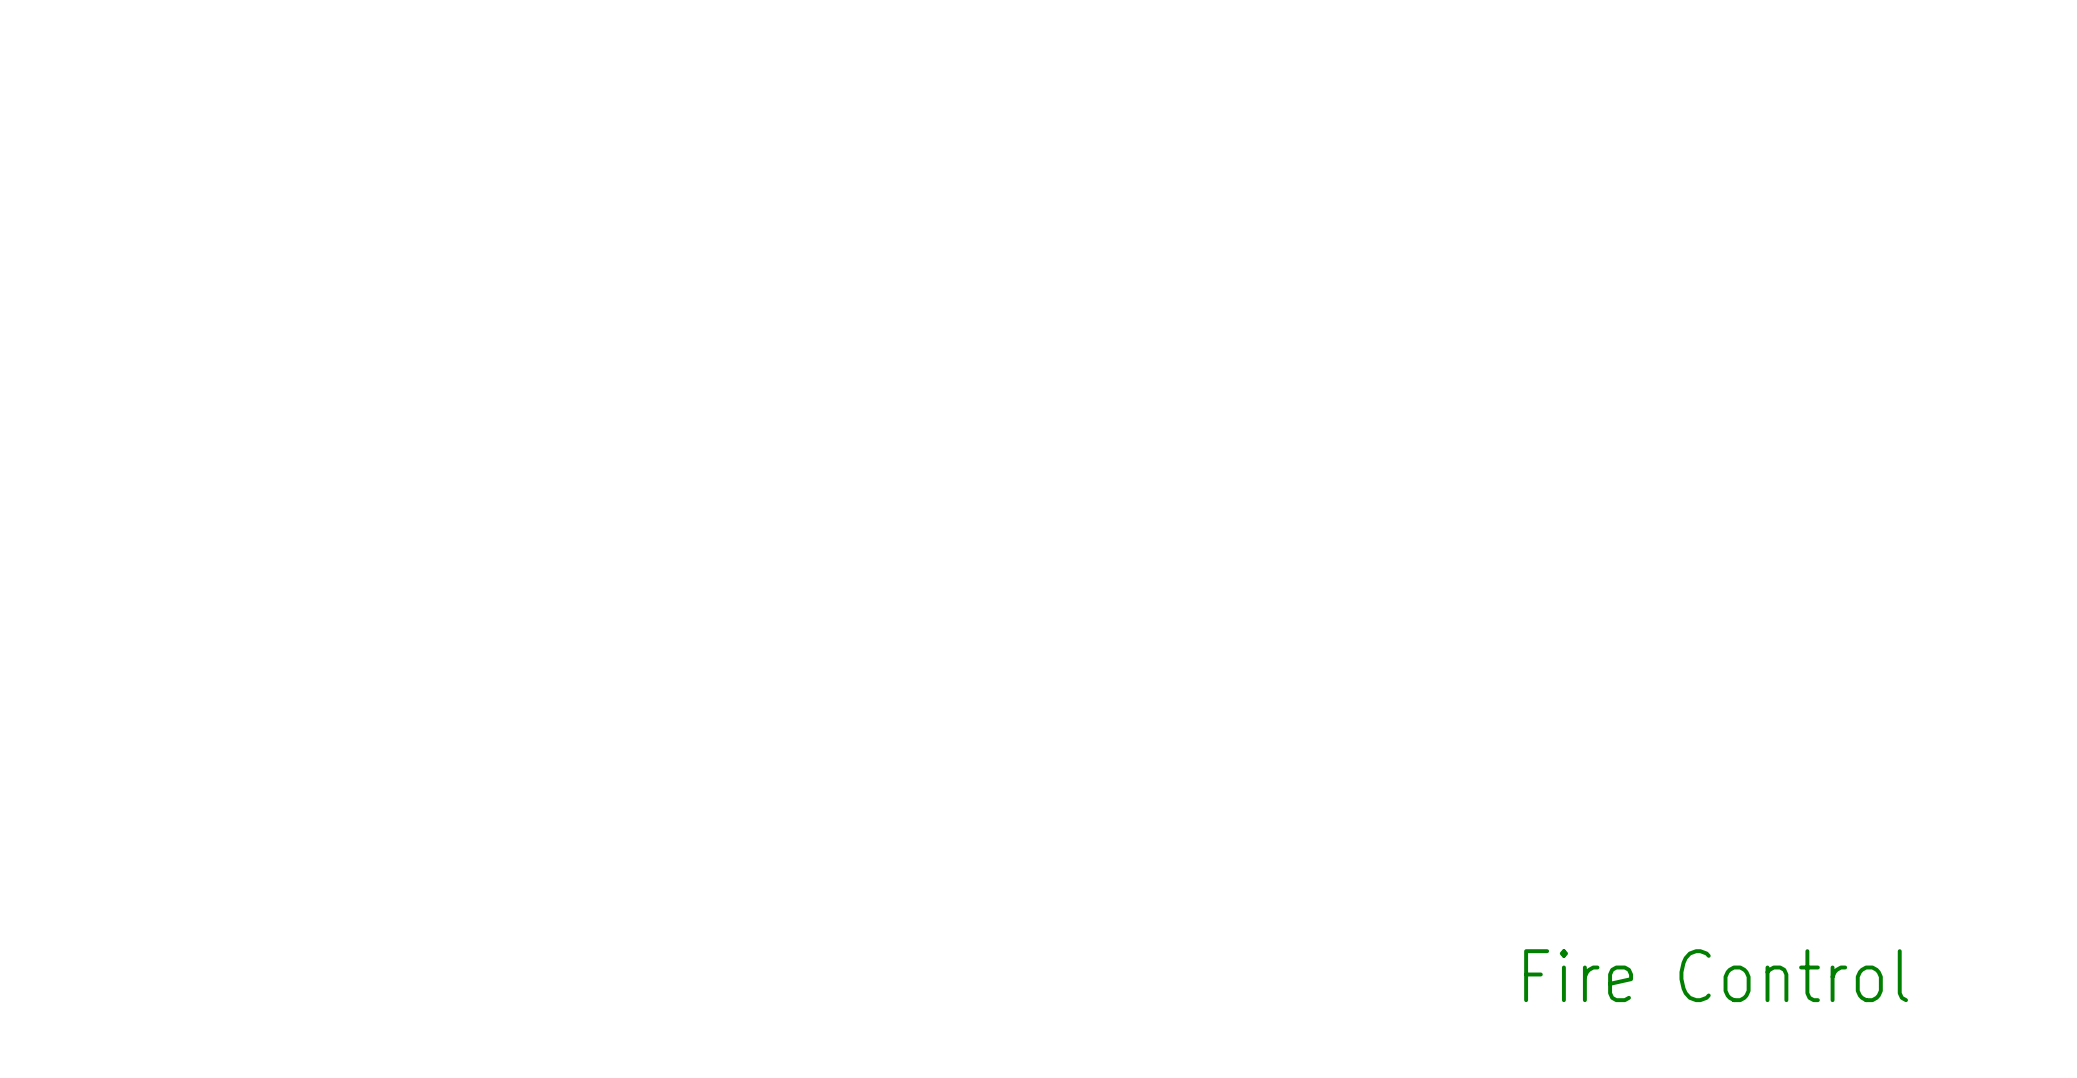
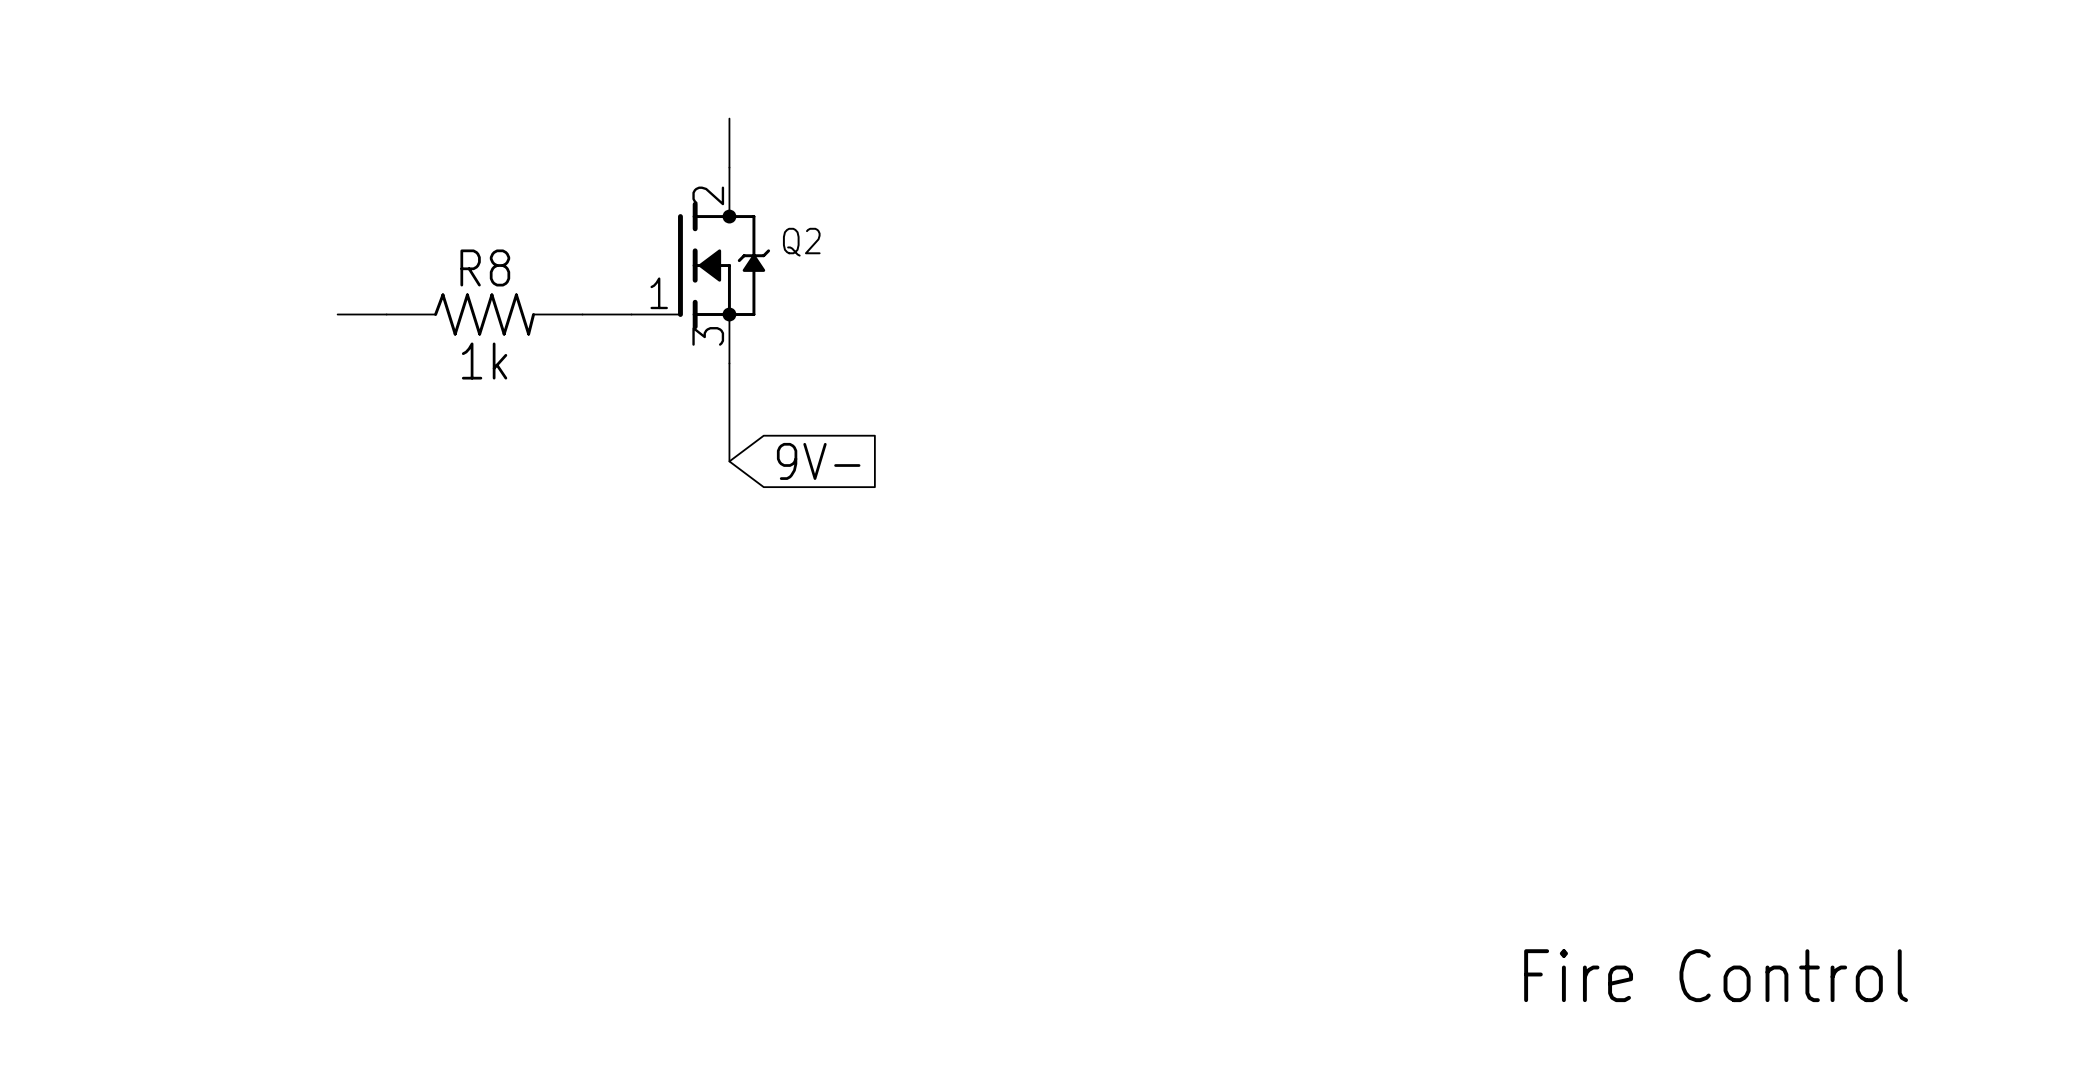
wire: none -> (729, 118) (729, 167)
Q2: none -> (700, 265)
wire: none -> (337, 314) (386, 314)
R8: none -> 1k (484, 314)
wire: none -> (582, 314) (631, 314)
wire: none -> (729, 363) (729, 461)
global label: none -> 9V- (818, 461)

